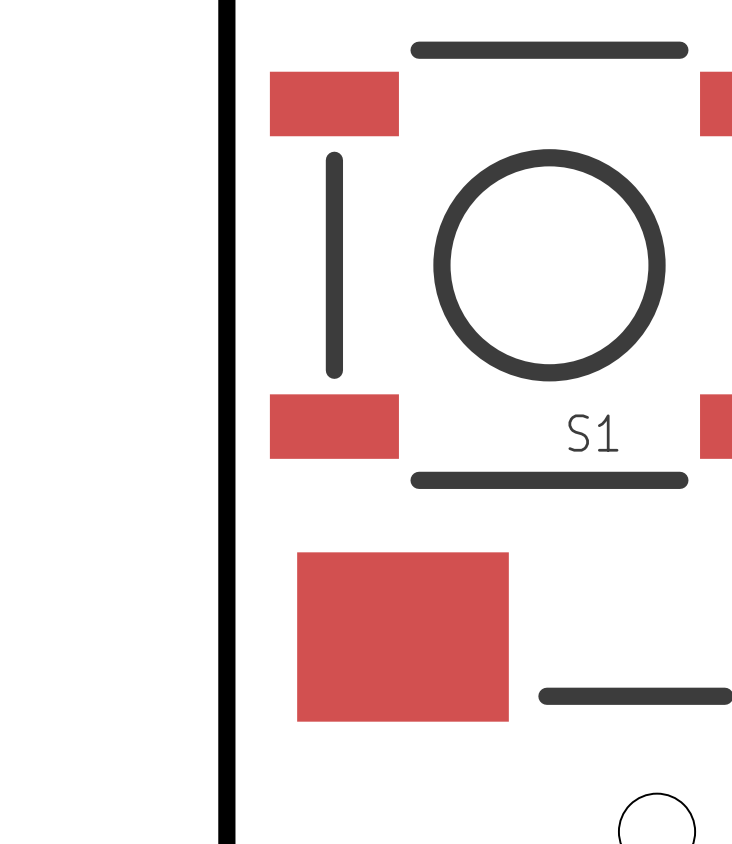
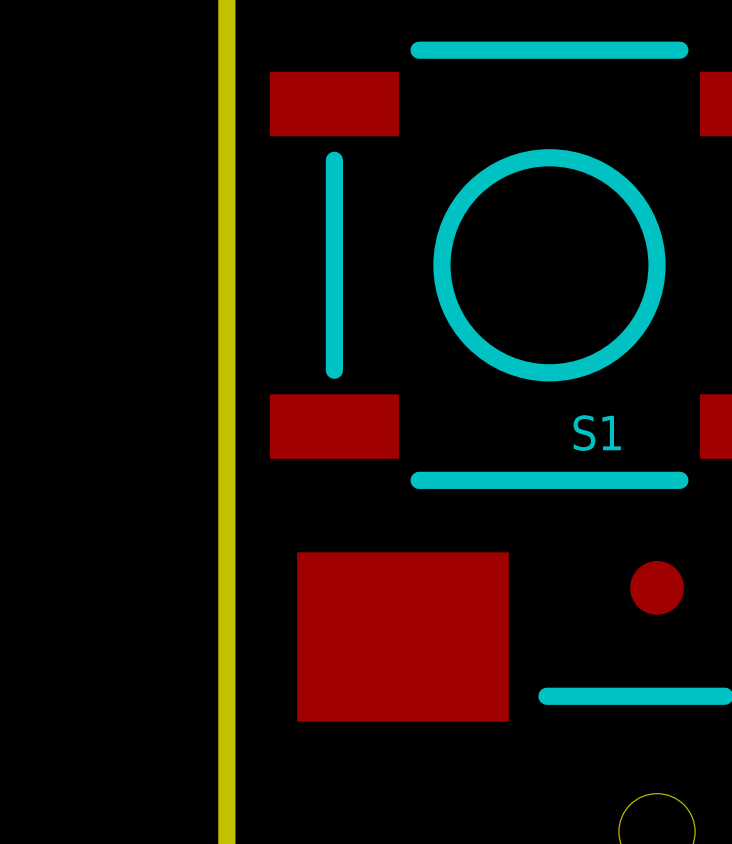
part: none -> (657, 587)

